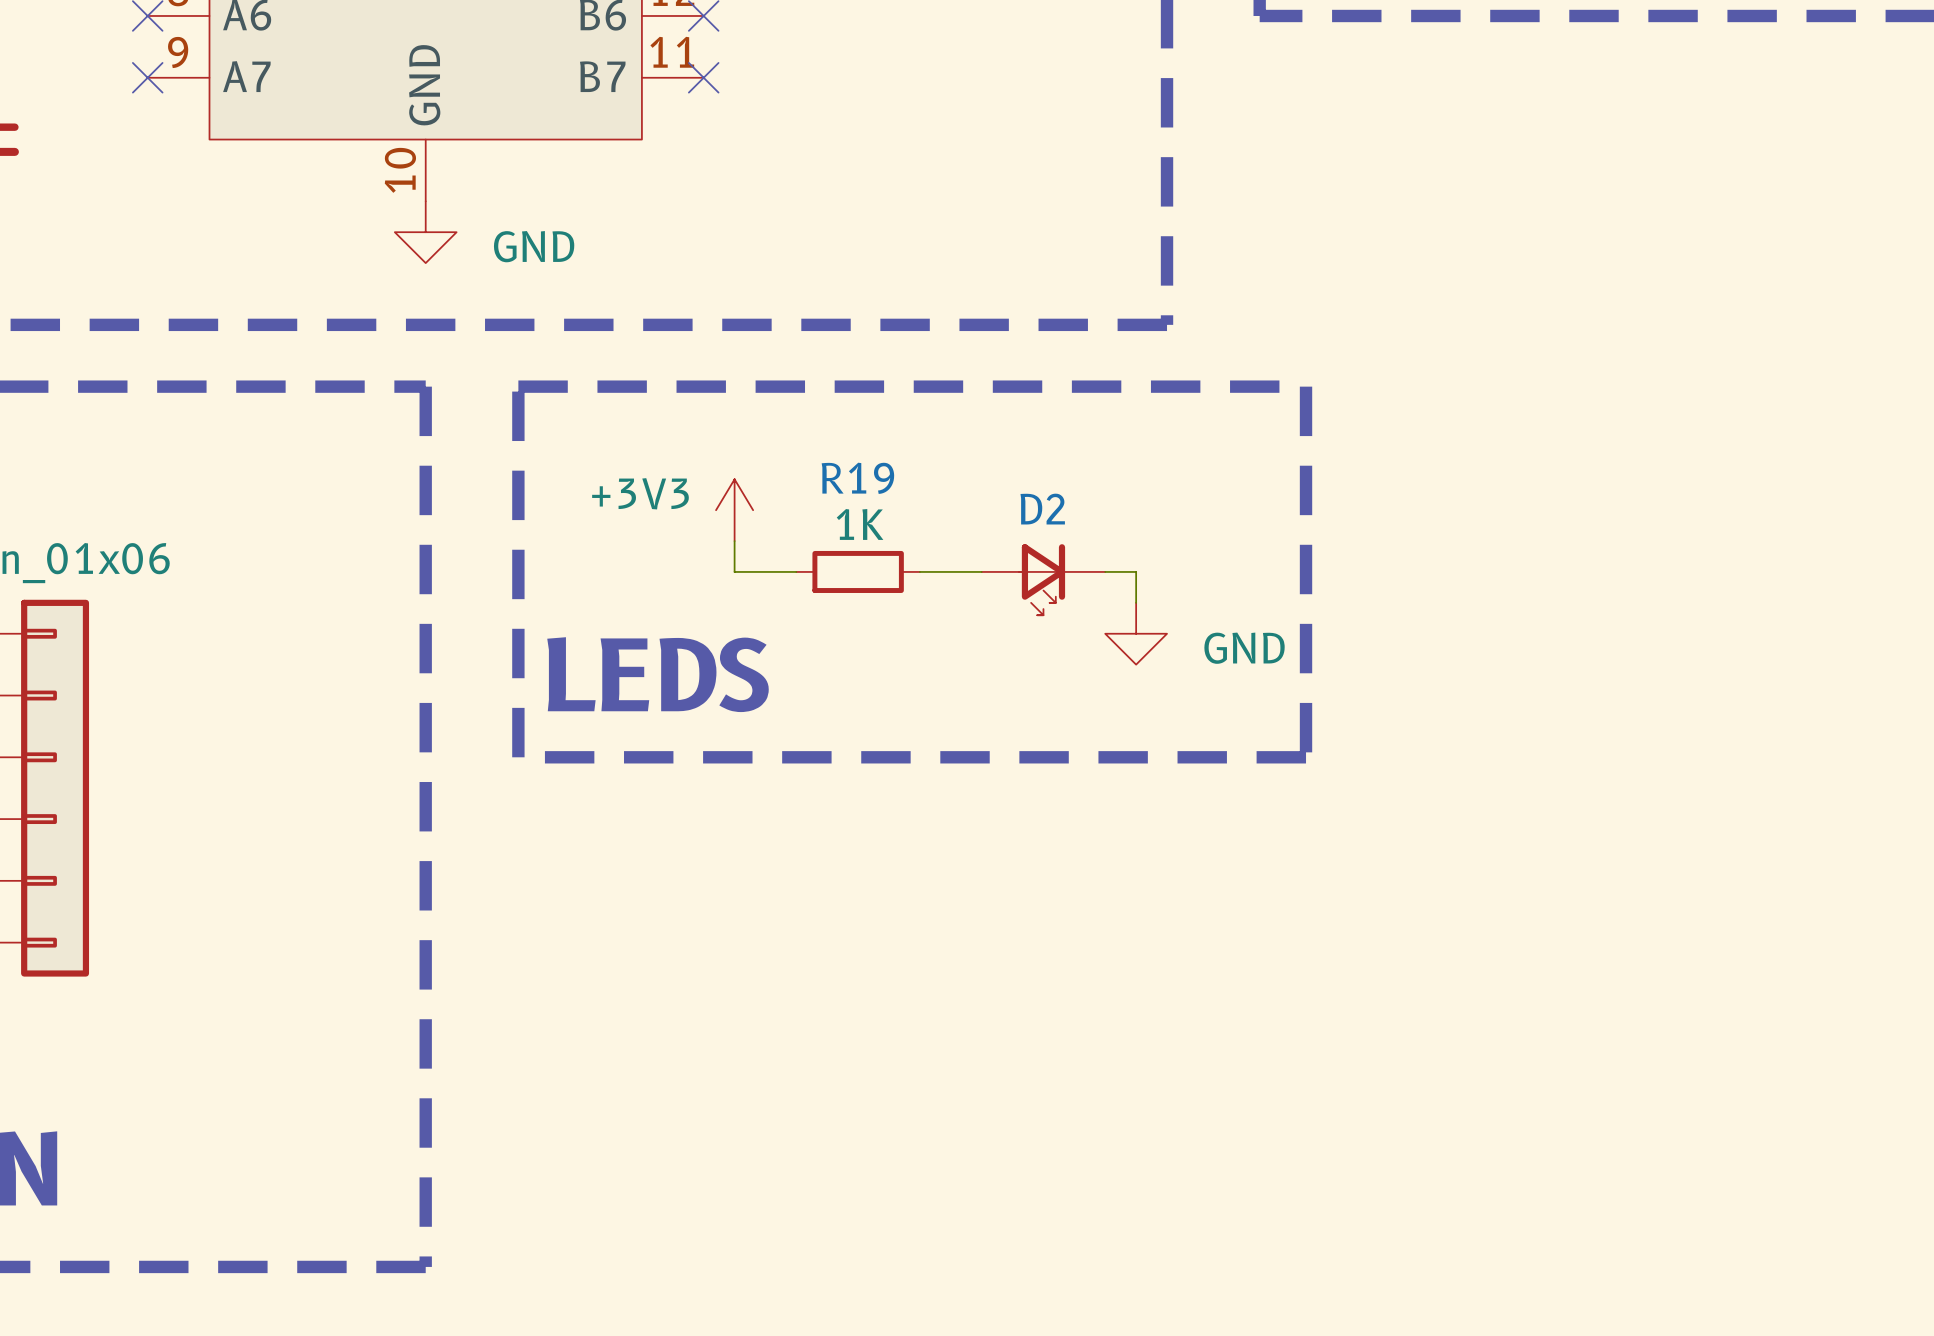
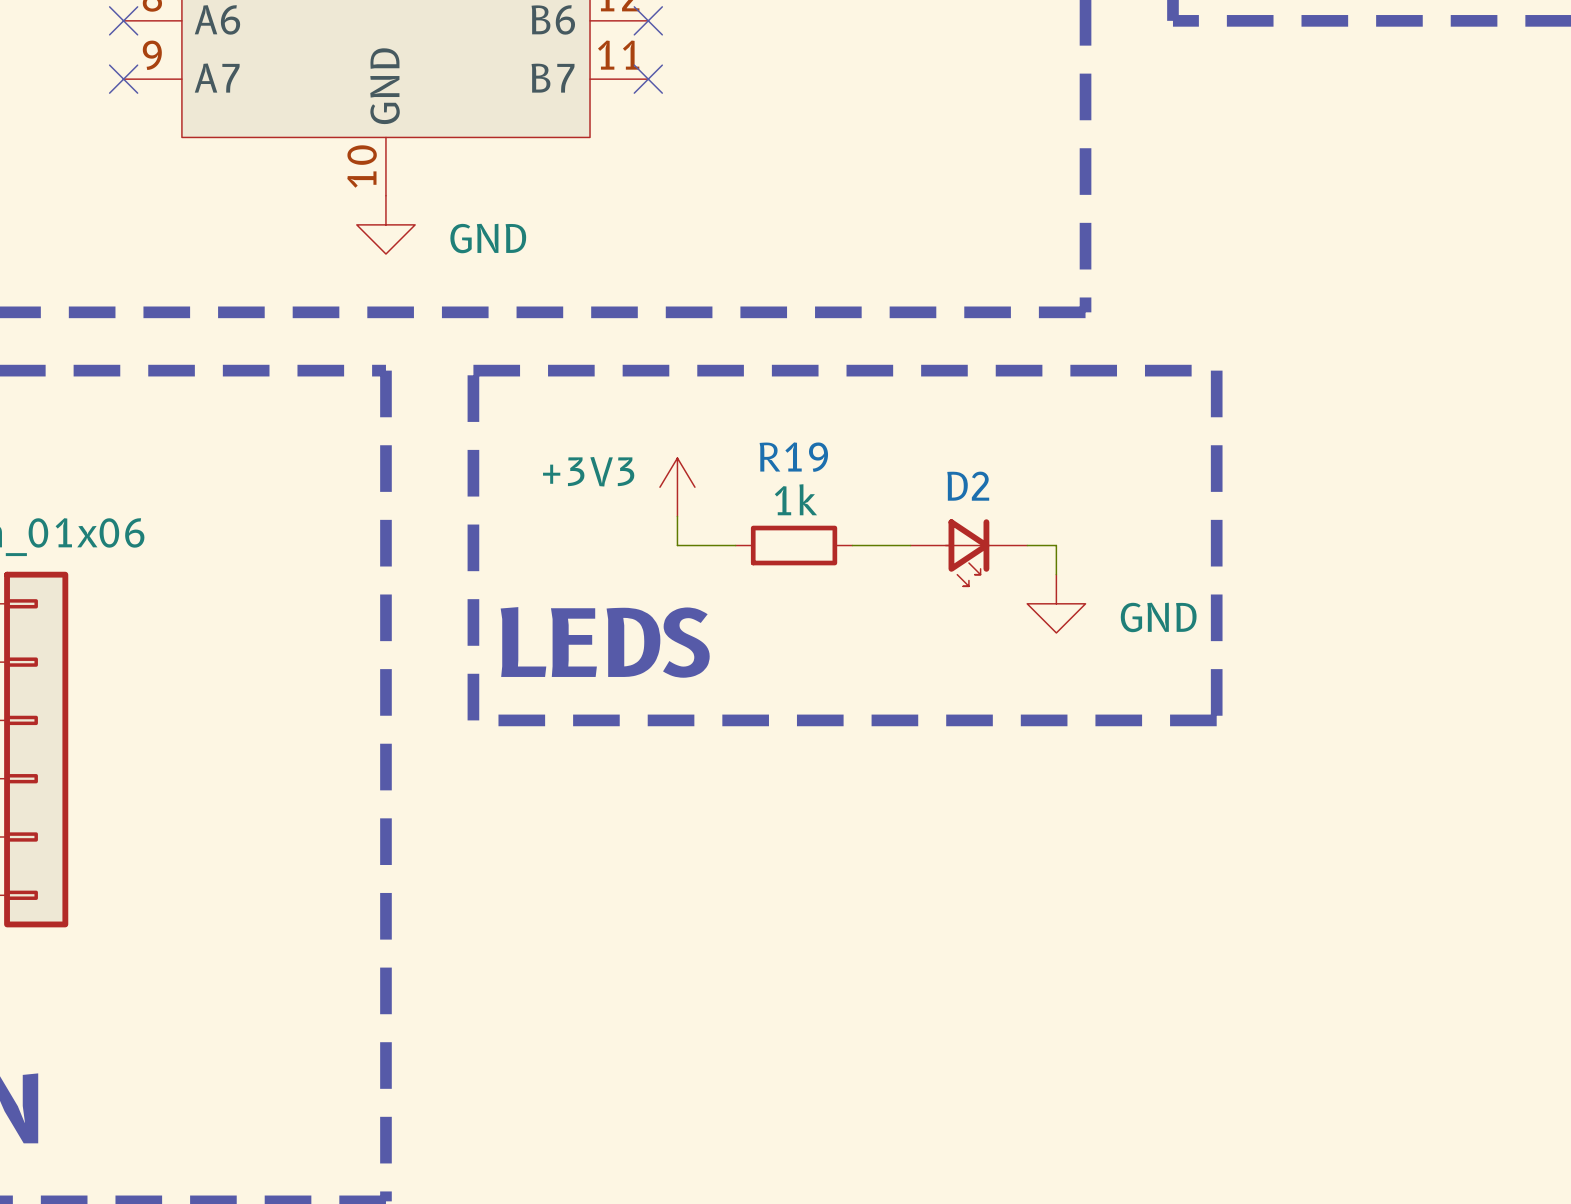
R19 value: 1K (860, 524) -> 1k (795, 499)

